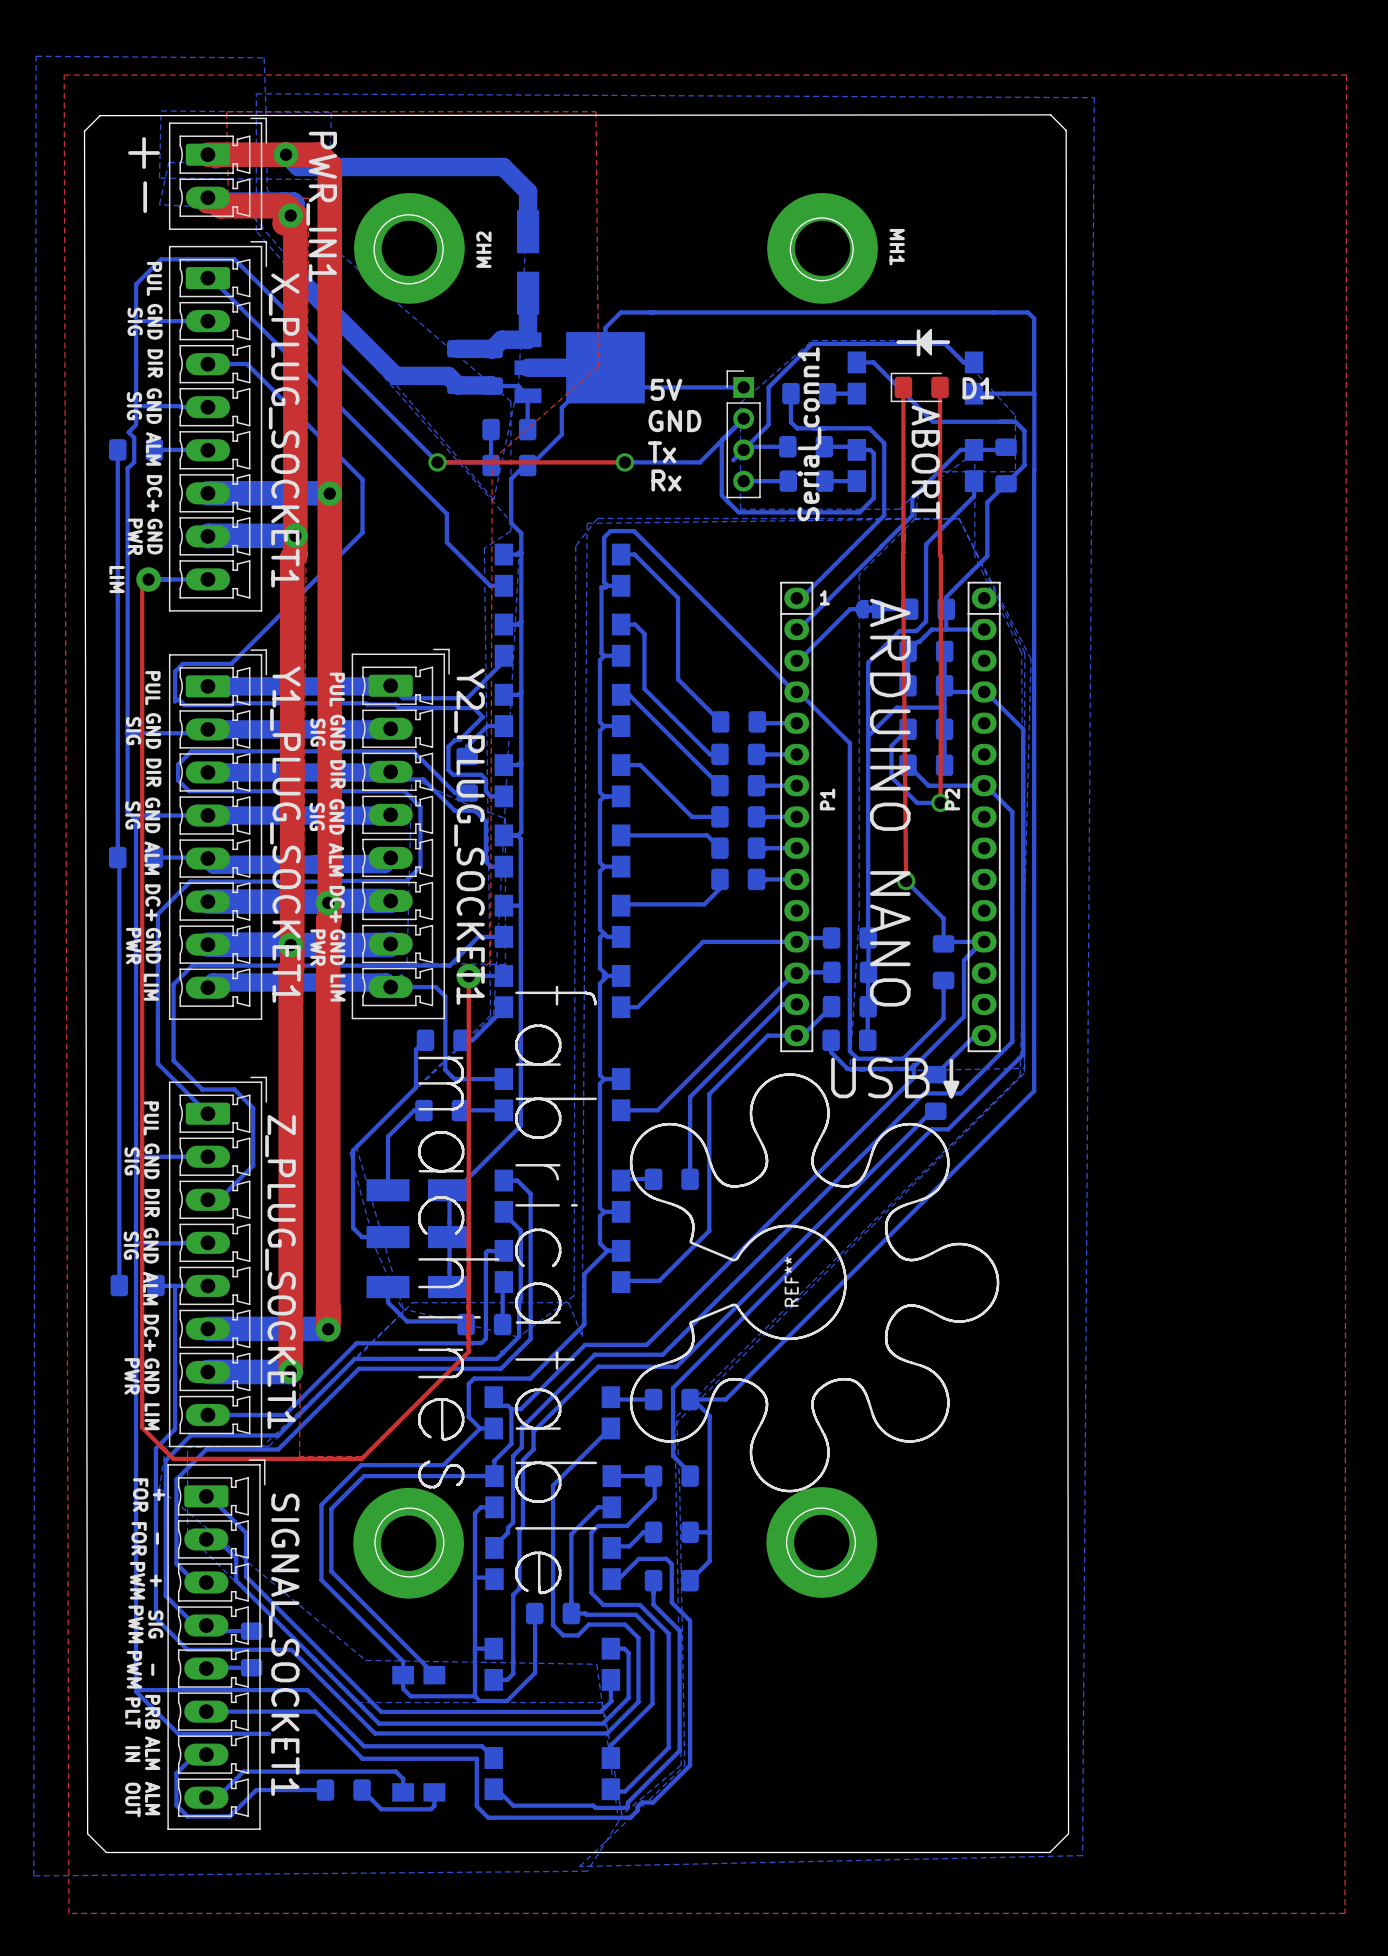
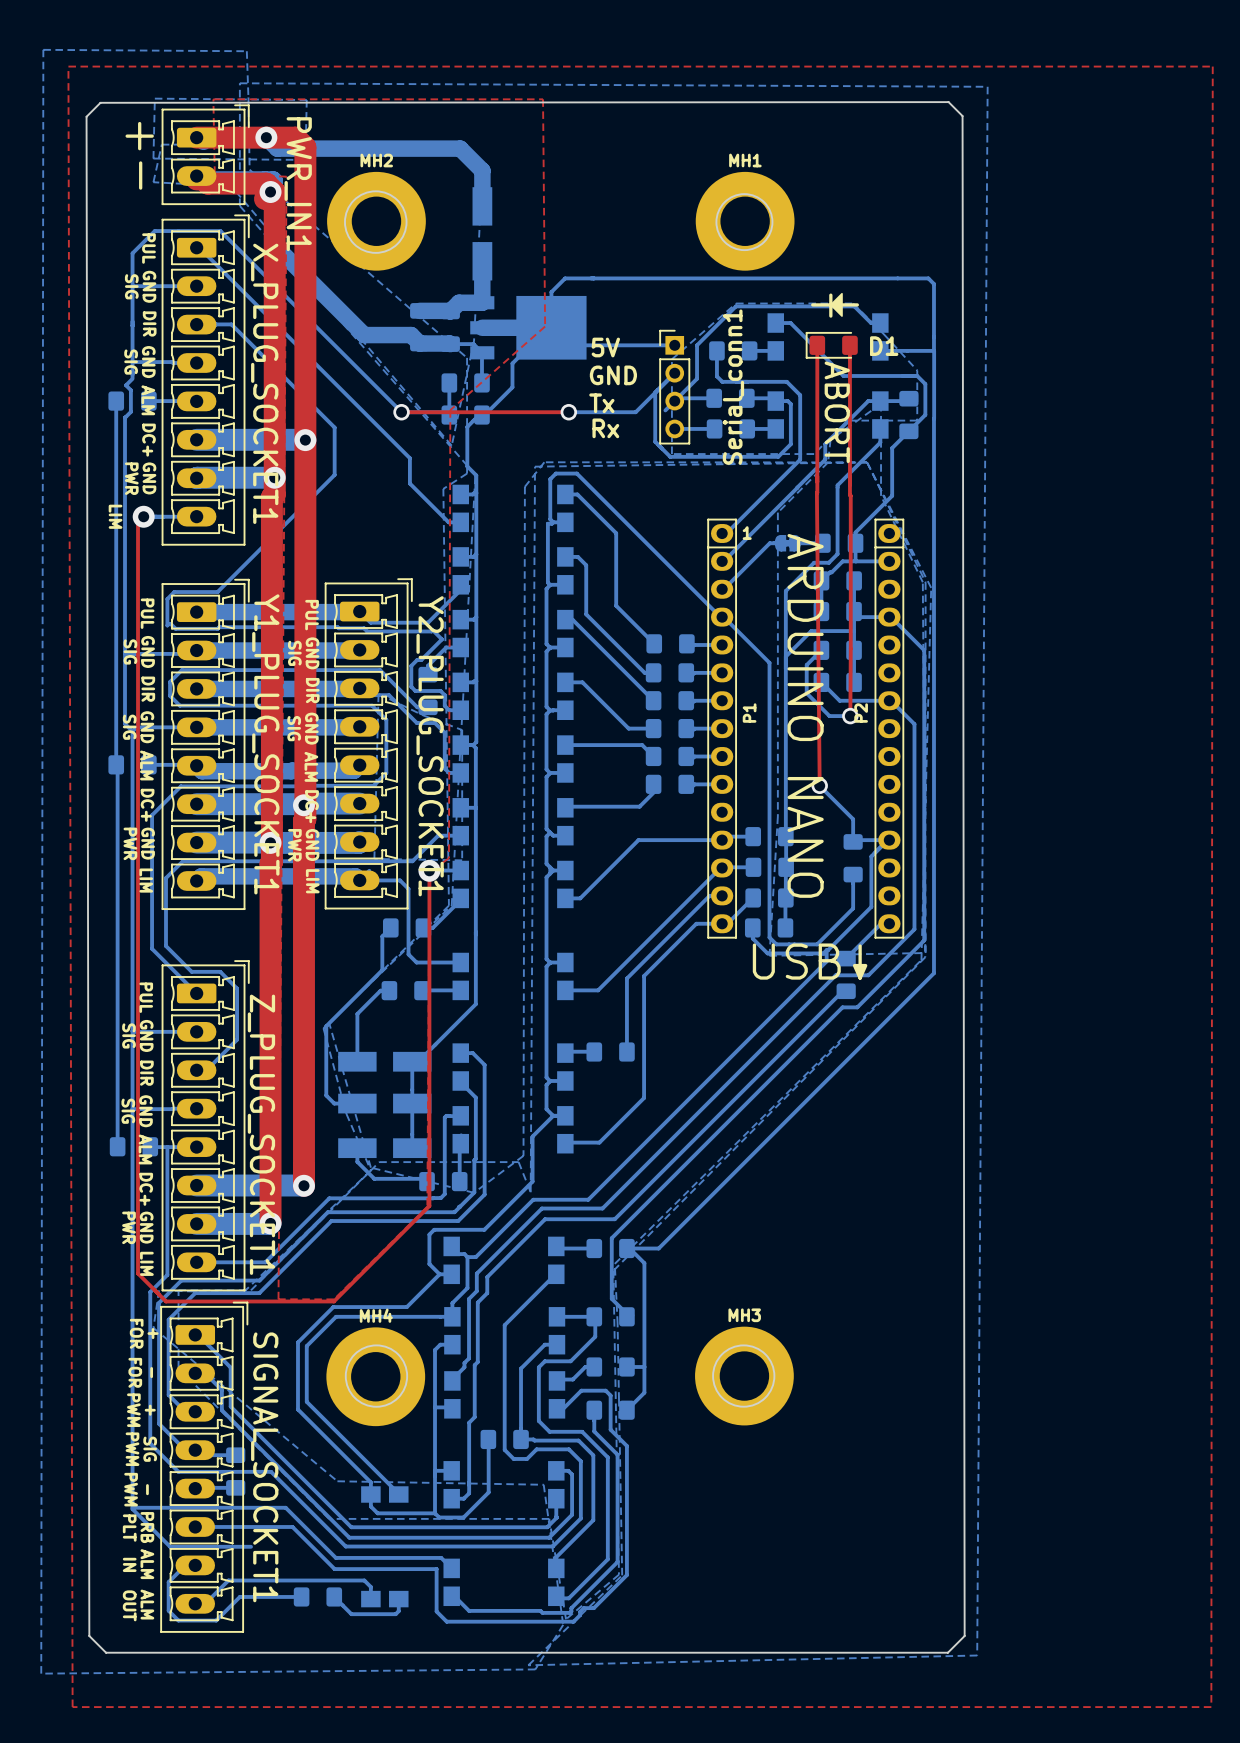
MH1 name rotation: 0° (897, 247) -> 90° counterclockwise (745, 160)
MH1 name position: MH1 (897, 247) -> MH1 (745, 160)
MH2 name rotation: 0° (483, 249) -> 90° clockwise (376, 160)
MH2 name position: MH2 (483, 249) -> MH2 (376, 160)
REF**: (708, 1289) -> none
MH4 name: none -> MH4 (376, 1315)
MH3 name: none -> MH3 (744, 1315)

